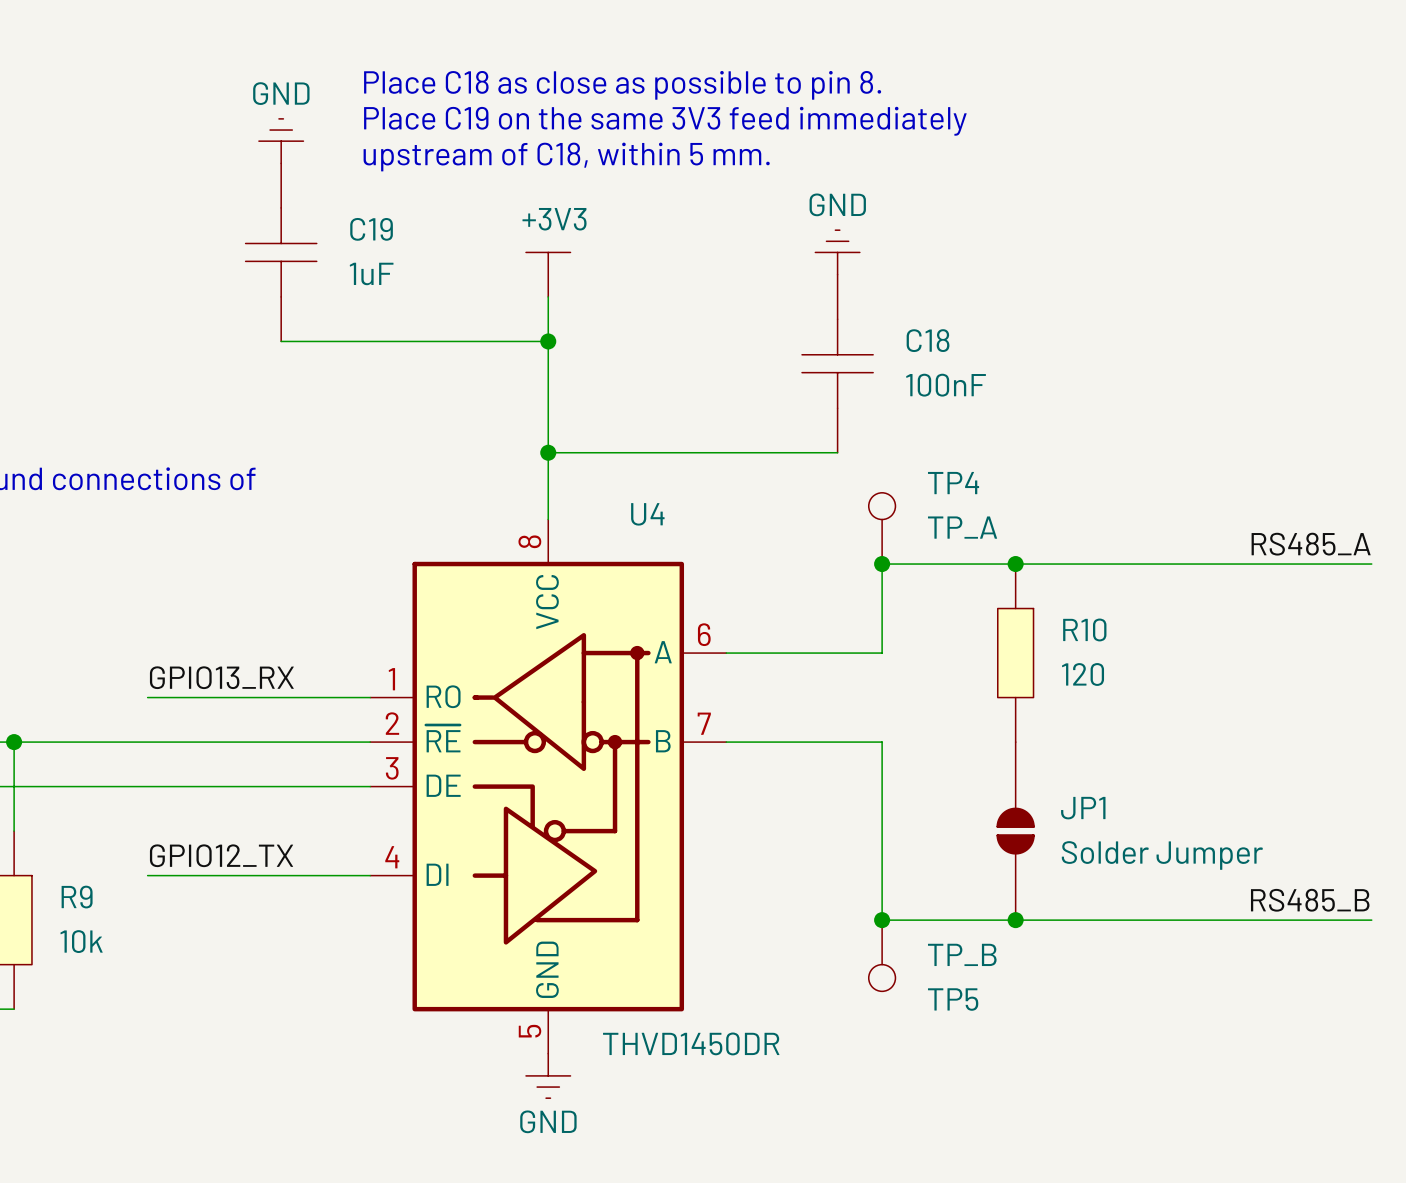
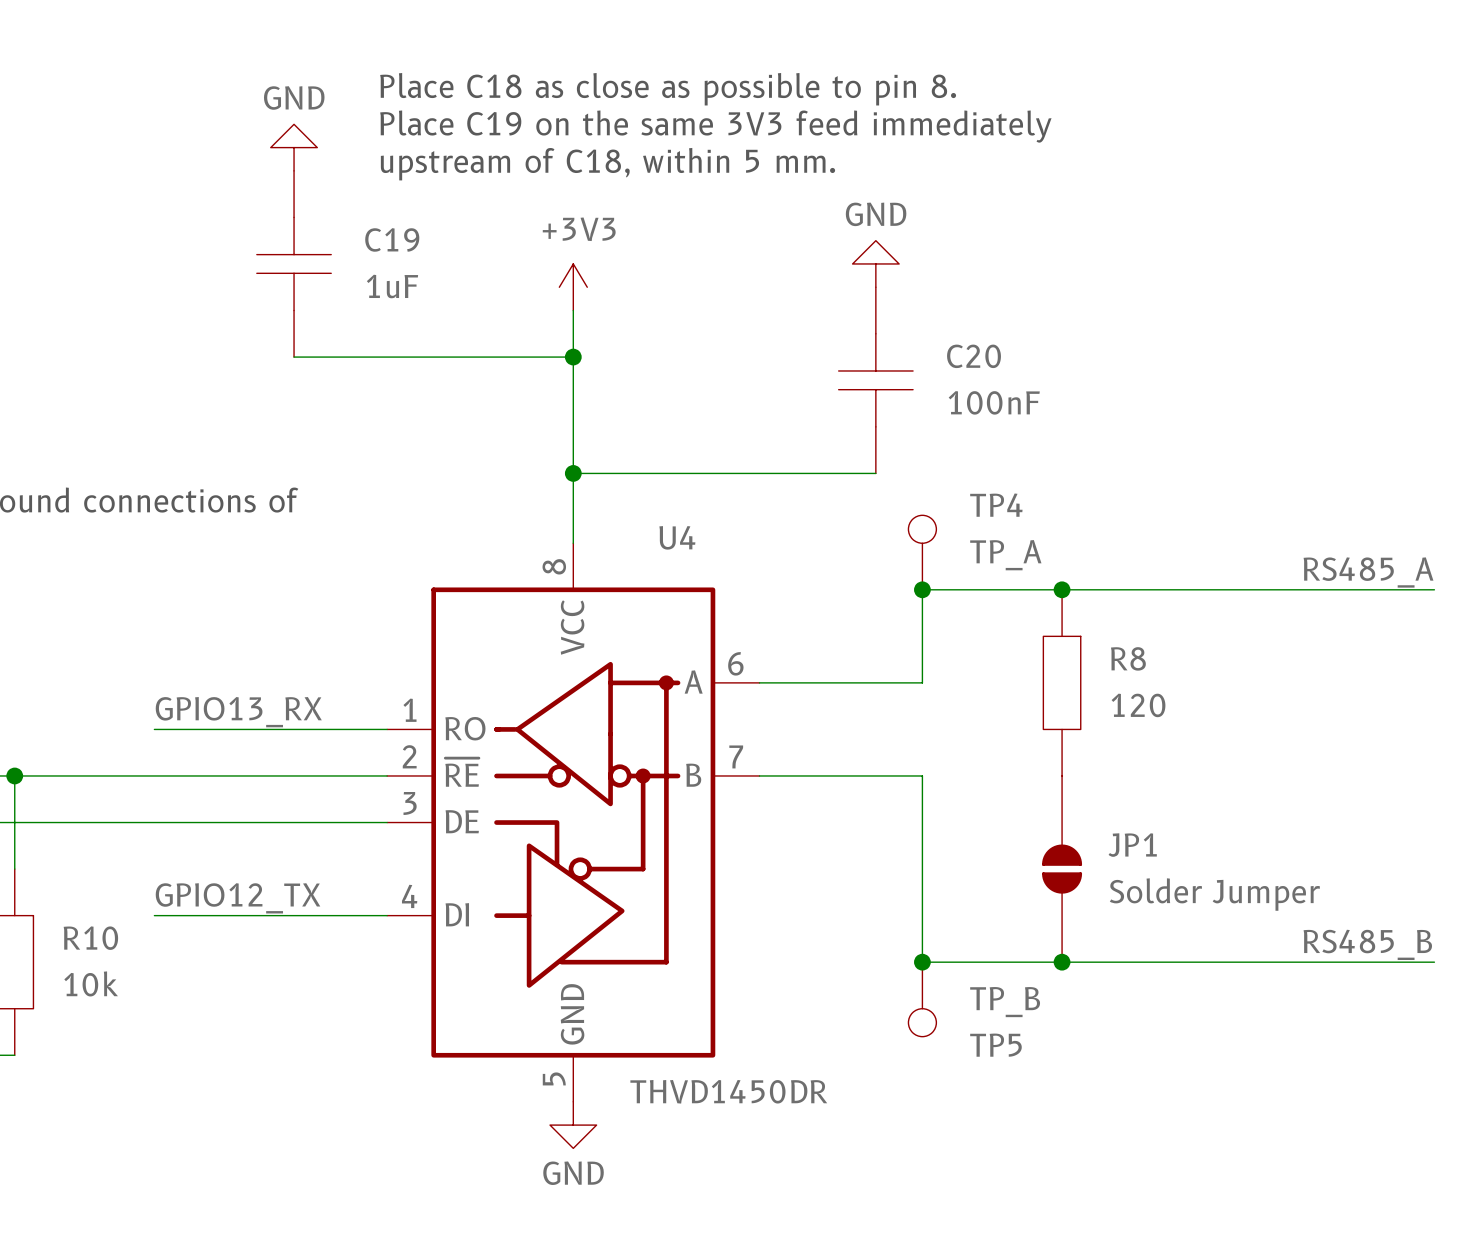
power symbol shape: [258, 118, 304, 164] -> [270, 124, 318, 171]
power symbol shape: [815, 230, 860, 275] -> [852, 240, 900, 288]
power symbol shape: [526, 252, 571, 297] -> [559, 263, 588, 311]
C18 name: C18 (928, 340) -> C20 (974, 356)
R10 name: R10 (1084, 629) -> R8 (1128, 658)
R9 name: R9 (77, 897) -> R10 (90, 938)
power symbol shape: [526, 1053, 571, 1099] -> [550, 1101, 597, 1149]

